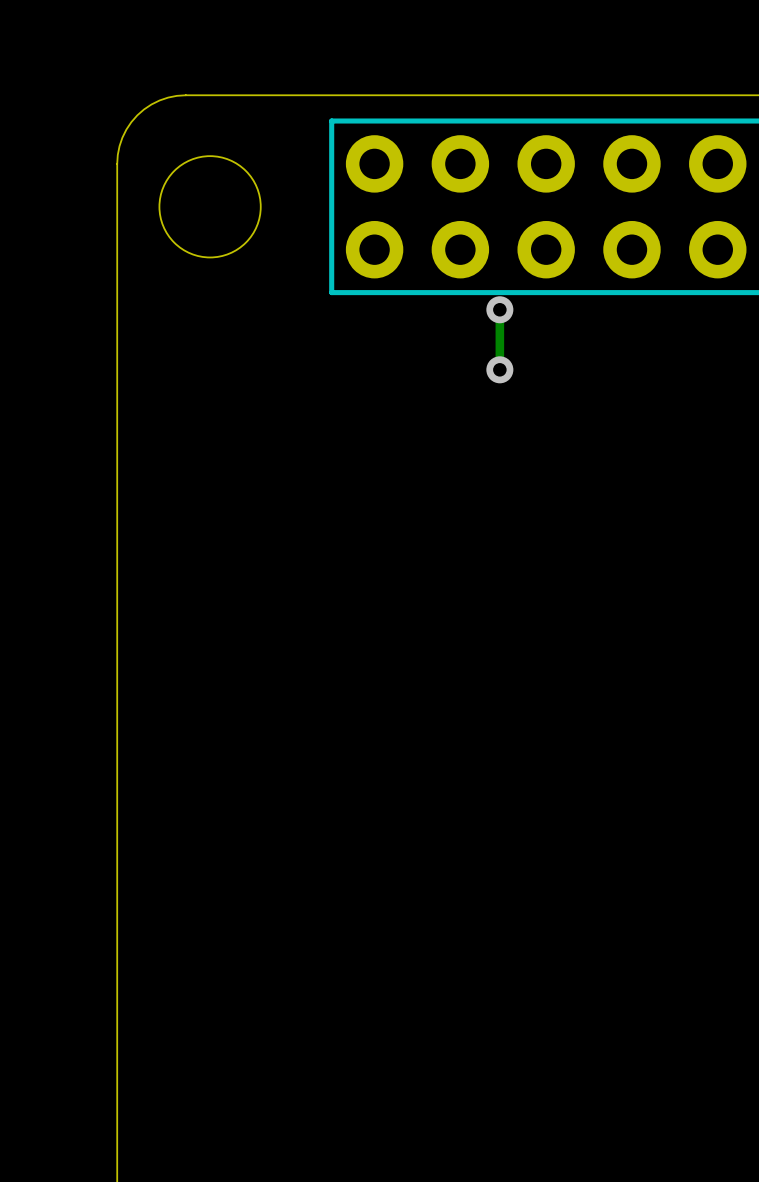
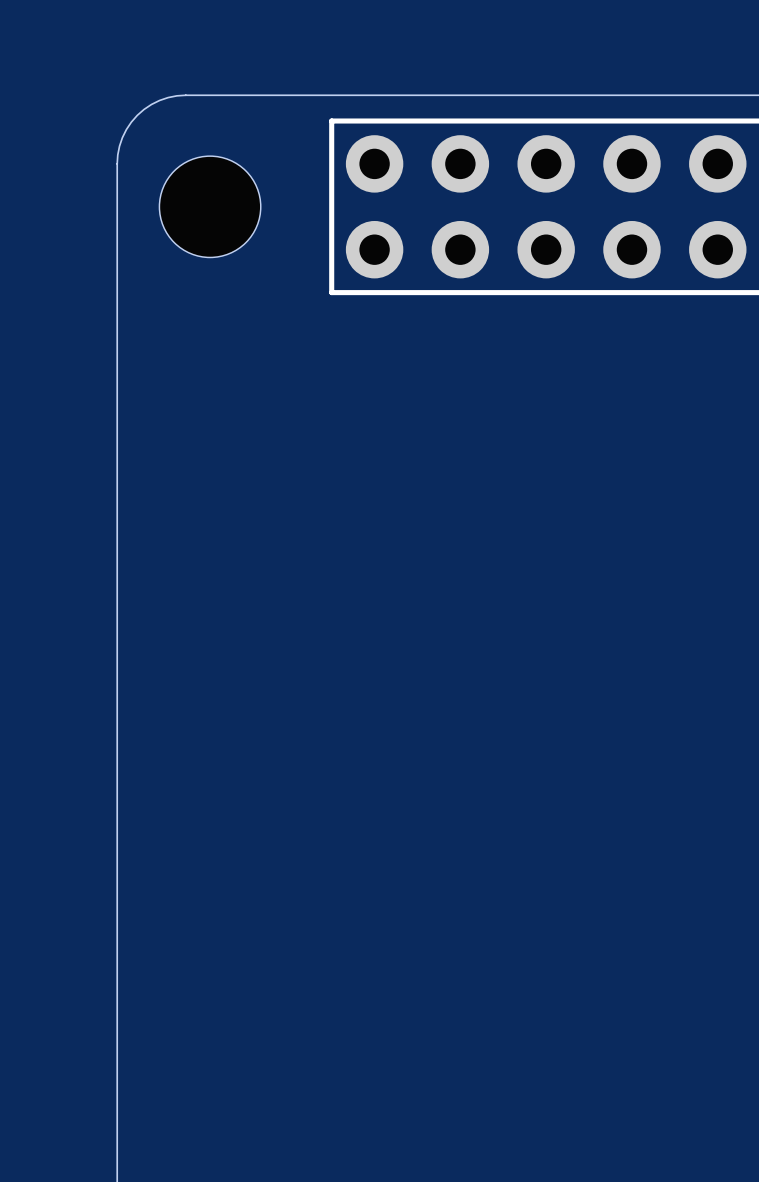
track: (499, 309) (499, 369) -> none
via: (499, 309) -> none
via: (499, 369) -> none

